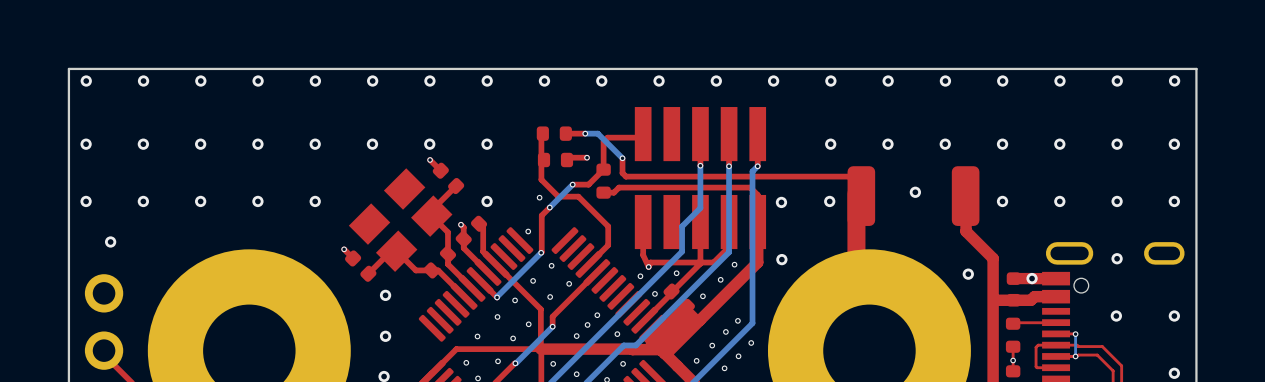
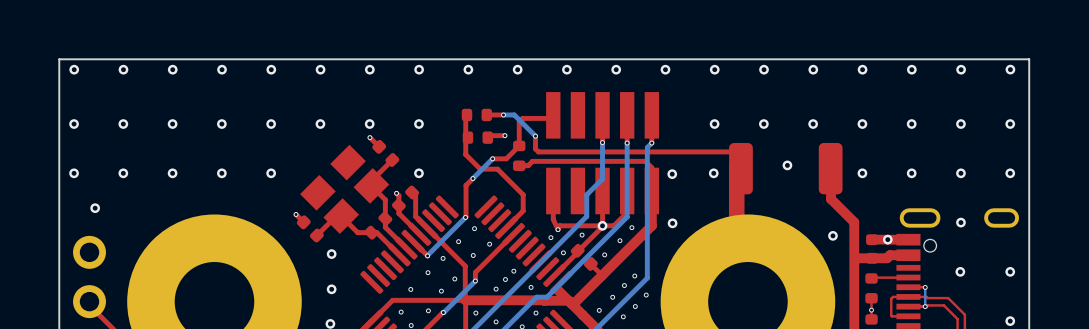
via: (539, 197) -> none
via: (528, 231) -> none
via: none -> (602, 225)
top track: (684, 315) (655, 343) -> none

